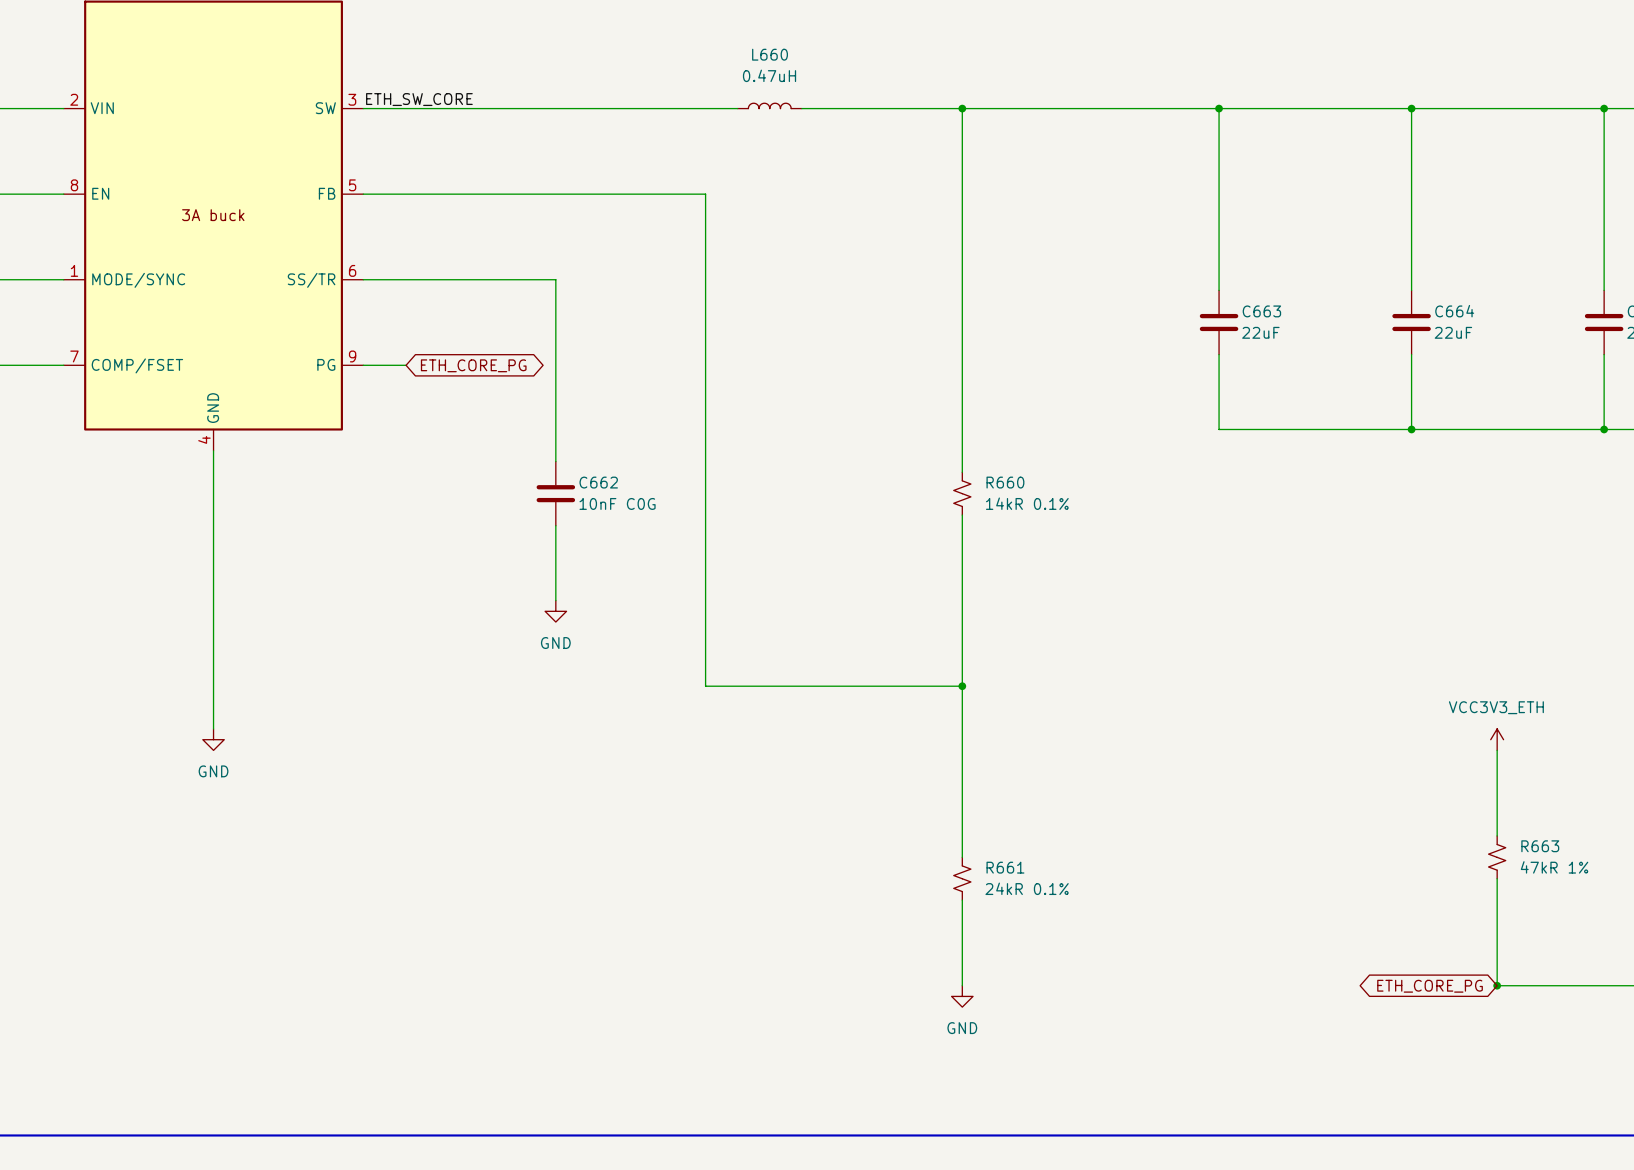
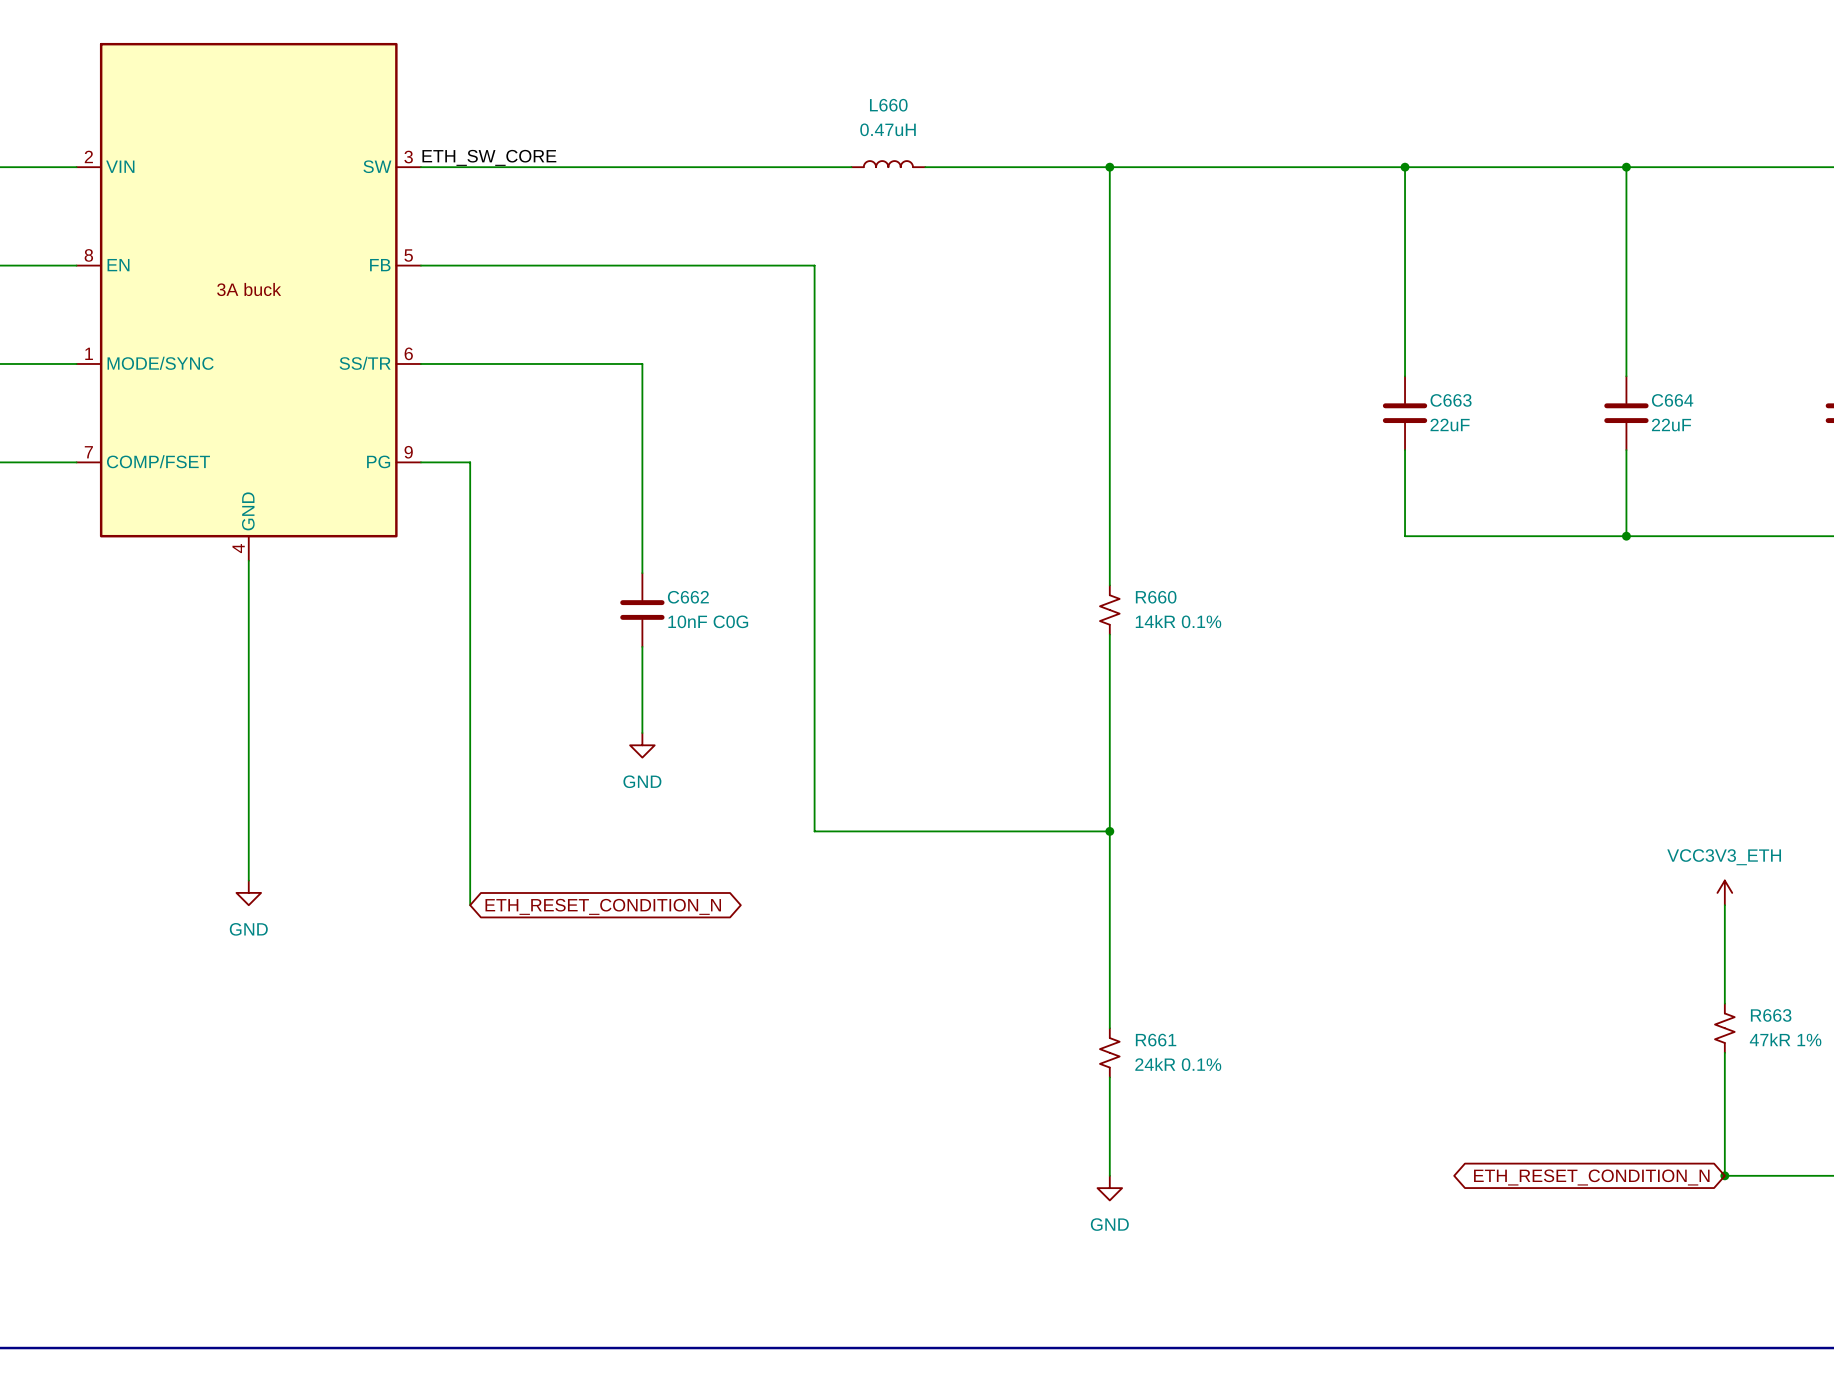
wire: none -> (470, 462) (470, 905)
global label: ETH_CORE_PG (473, 365) -> none
global label: none -> ETH_RESET_CONDITION_N (603, 906)
global label: ETH_CORE_PG (1430, 986) -> ETH_RESET_CONDITION_N (1591, 1177)

